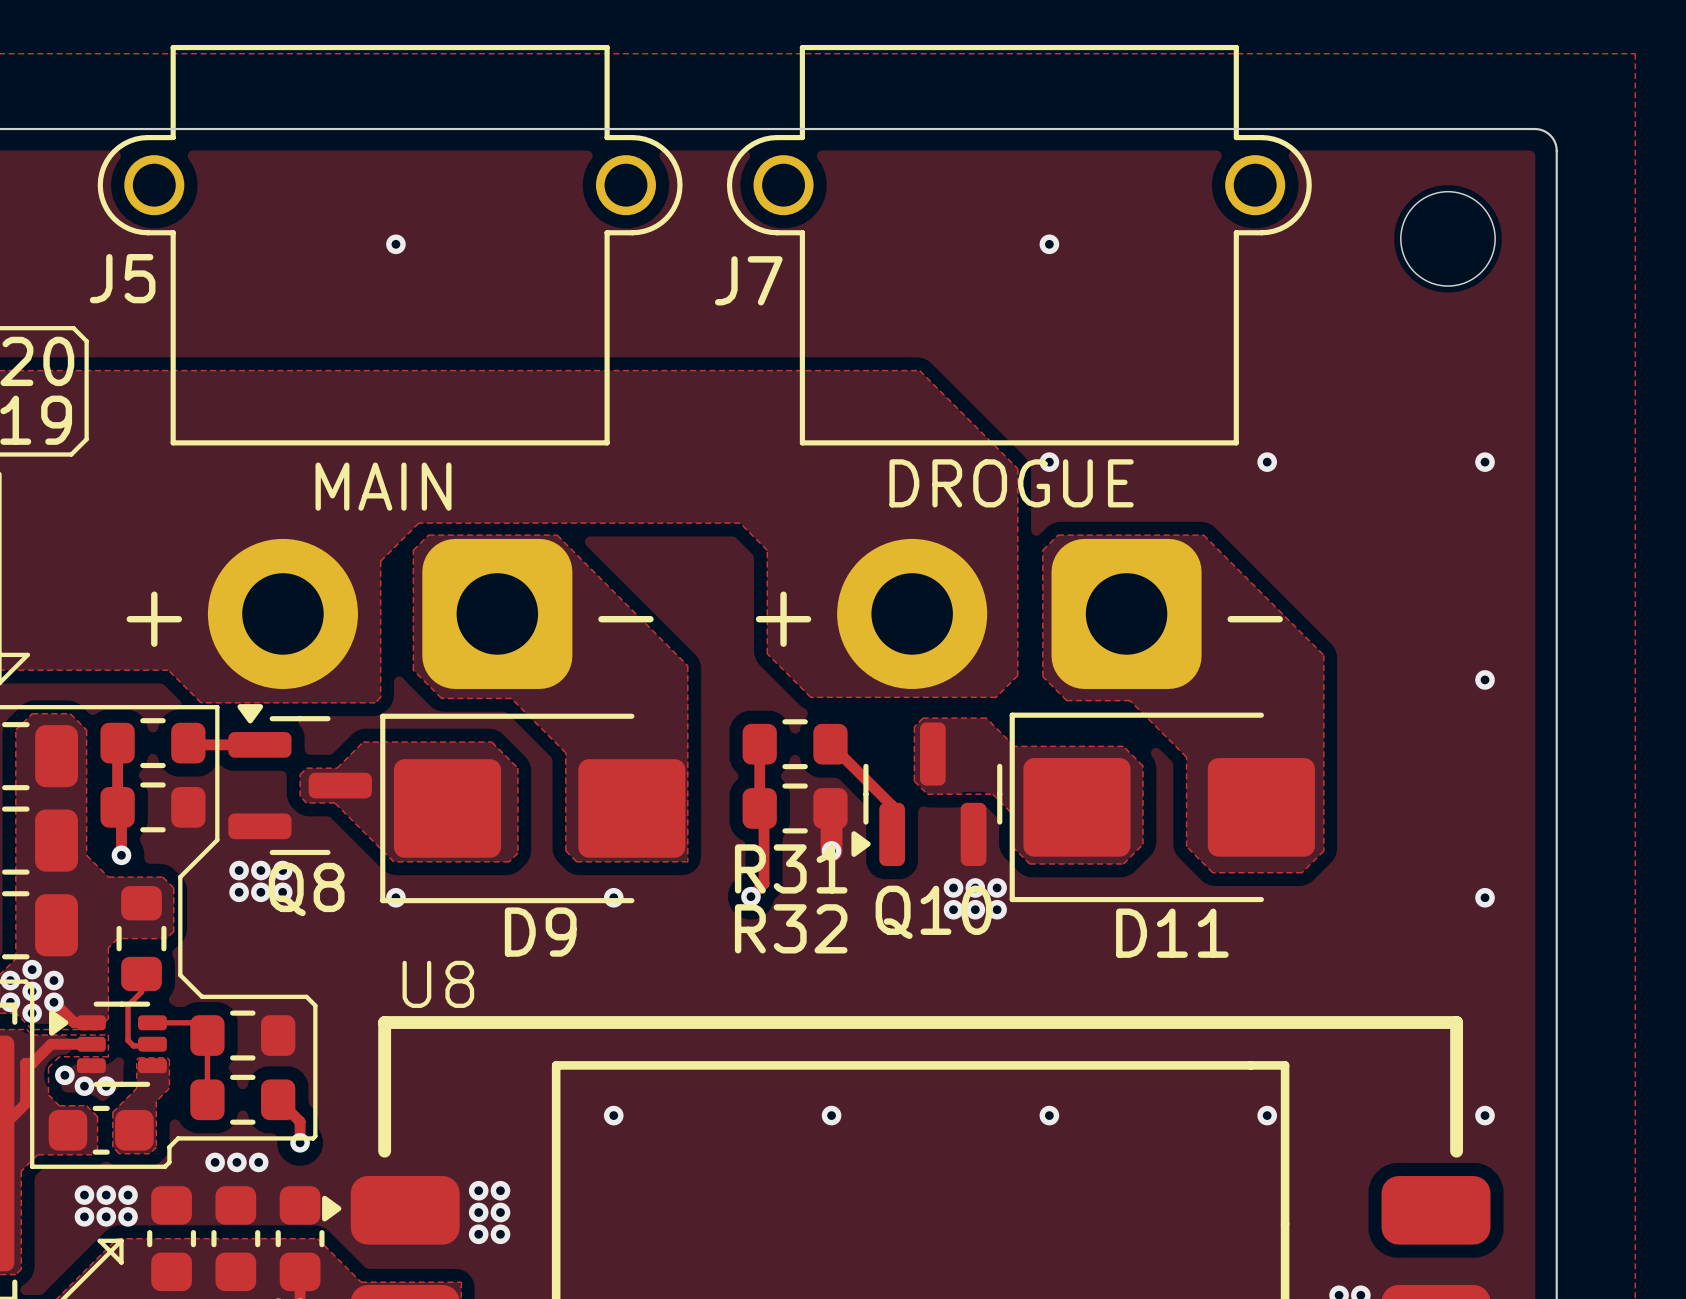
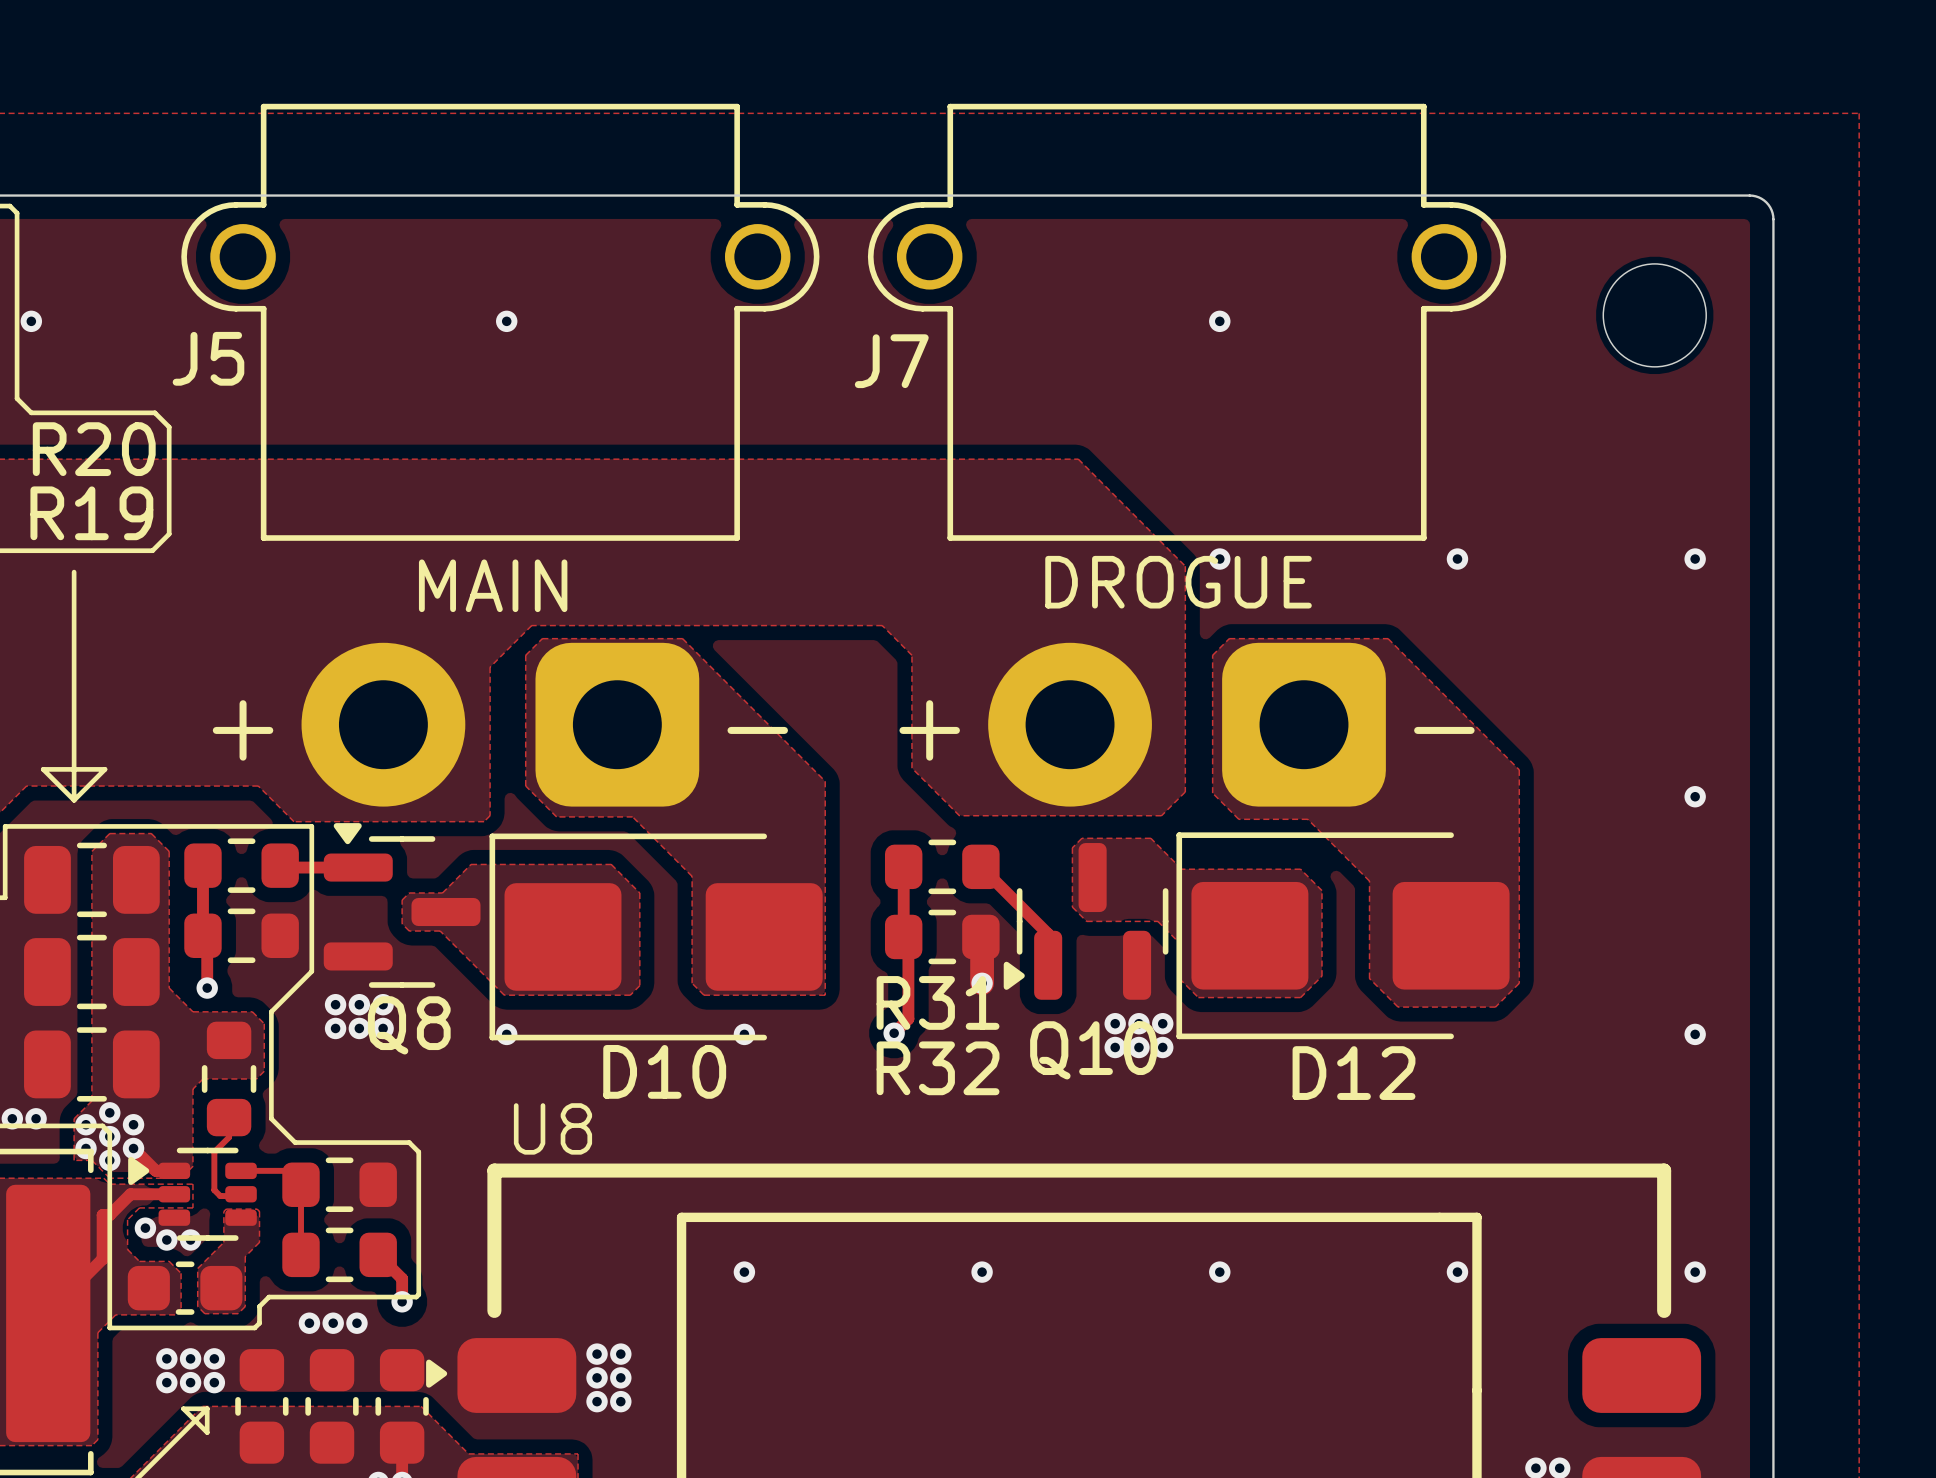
D9 name: D9 (540, 932) -> D10 (664, 1071)
D11 name: D11 (1172, 933) -> D12 (1354, 1073)

